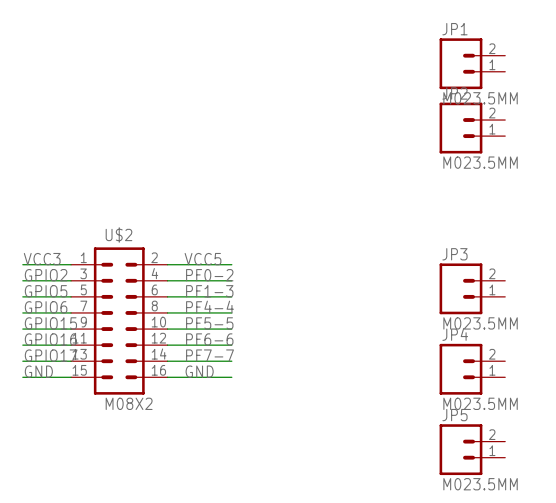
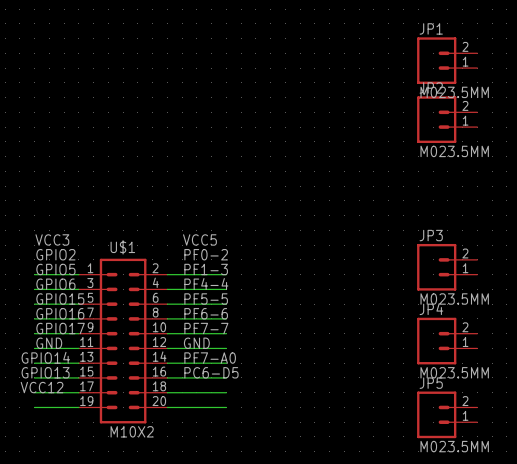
wire: (22, 264) (71, 264) -> (34, 363) (78, 363)
wire: (167, 264) (231, 264) -> (167, 363) (226, 363)
wire: (22, 280) (71, 280) -> (34, 377) (78, 377)
wire: (167, 280) (231, 280) -> (167, 377) (226, 377)
U$2: M08X2 (119, 321) -> none
U$1: none -> M10X2 (123, 341)
label: none -> GPIO14 (45, 357)
label: none -> PF7-A0 (210, 358)
label: none -> GPIO13 (45, 372)
label: none -> PC6-D5 (211, 372)
label: none -> VCC12 (42, 387)
wire: none -> (34, 392) (78, 392)
wire: none -> (167, 392) (226, 392)
wire: none -> (34, 407) (78, 407)
wire: none -> (167, 407) (226, 407)

